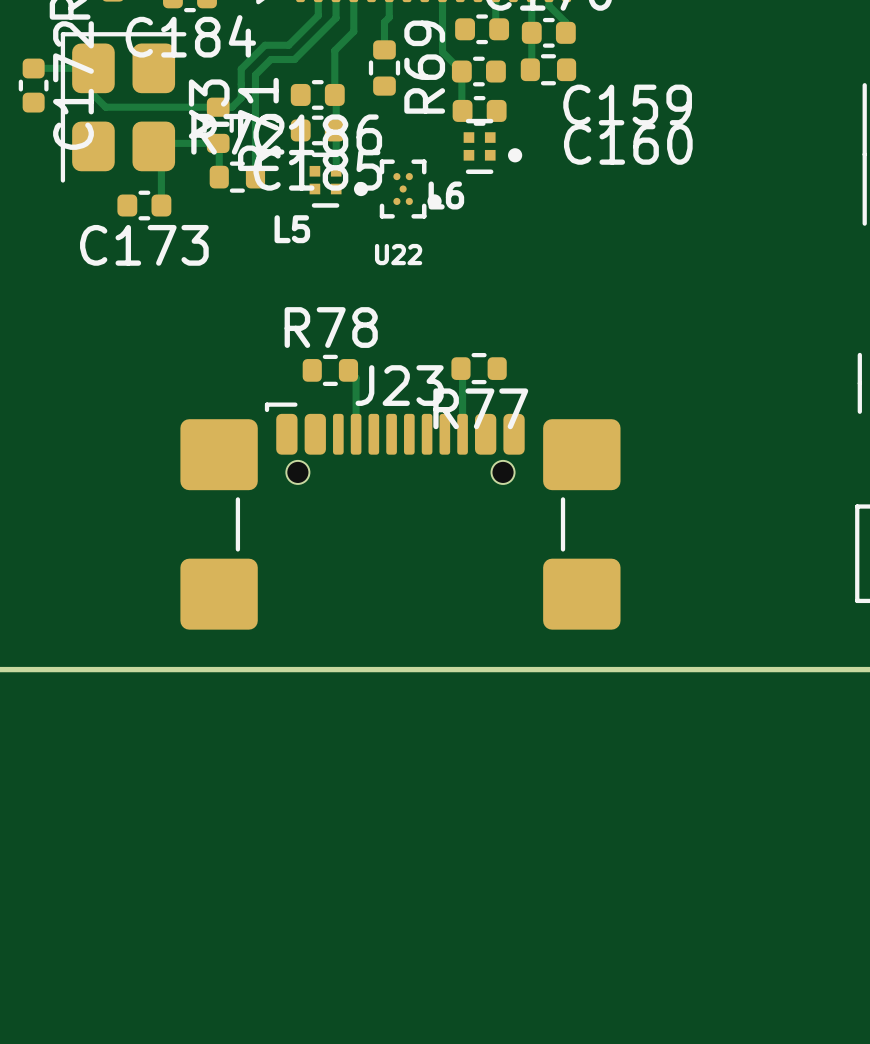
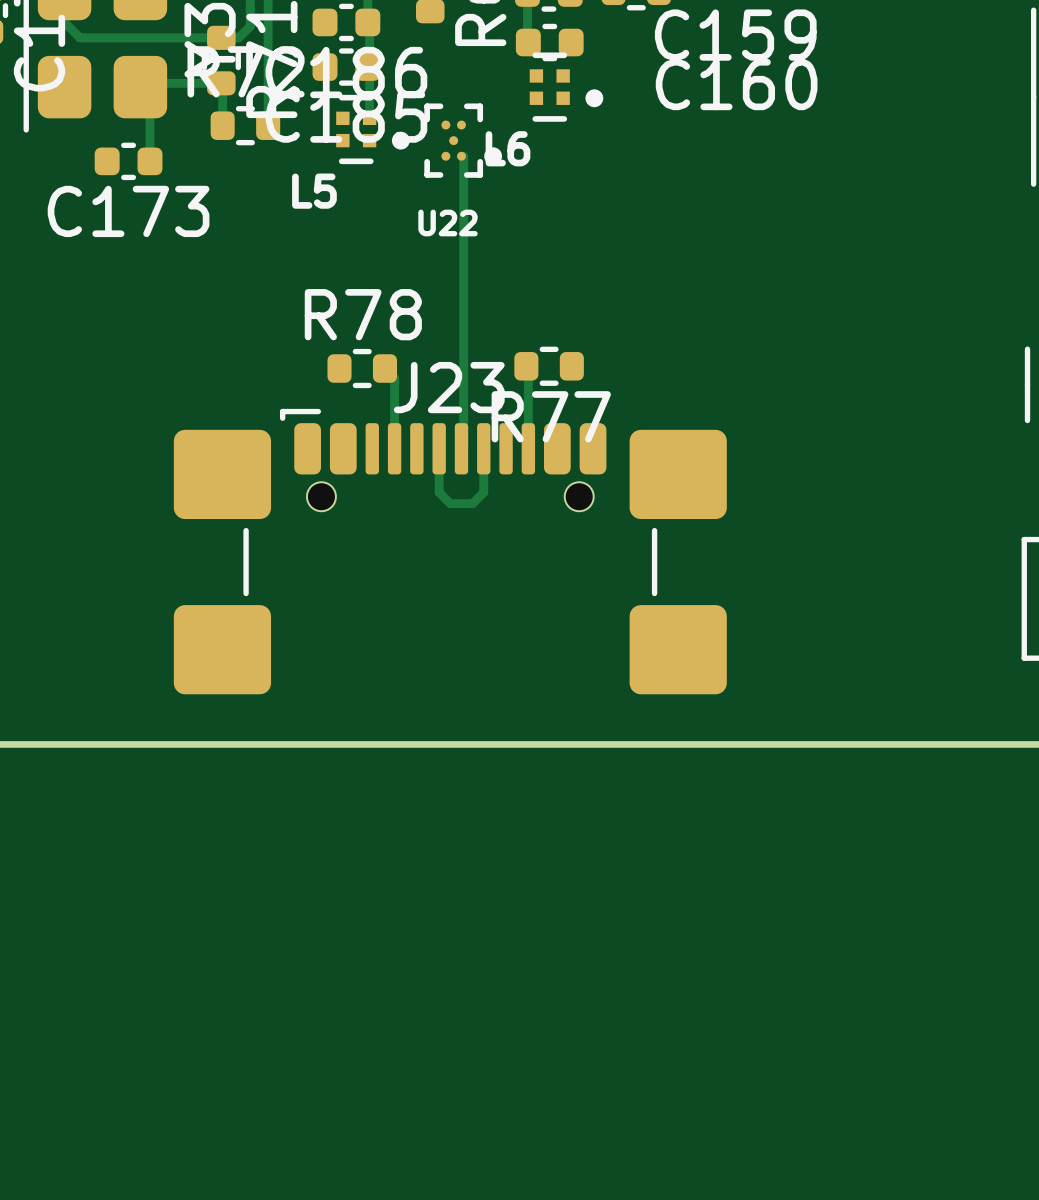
track: none -> (463, 156) (463, 446) (461, 448)
track: none -> (439, 448) (439, 492) (450, 503) (472, 503) (483, 492) (483, 448)

